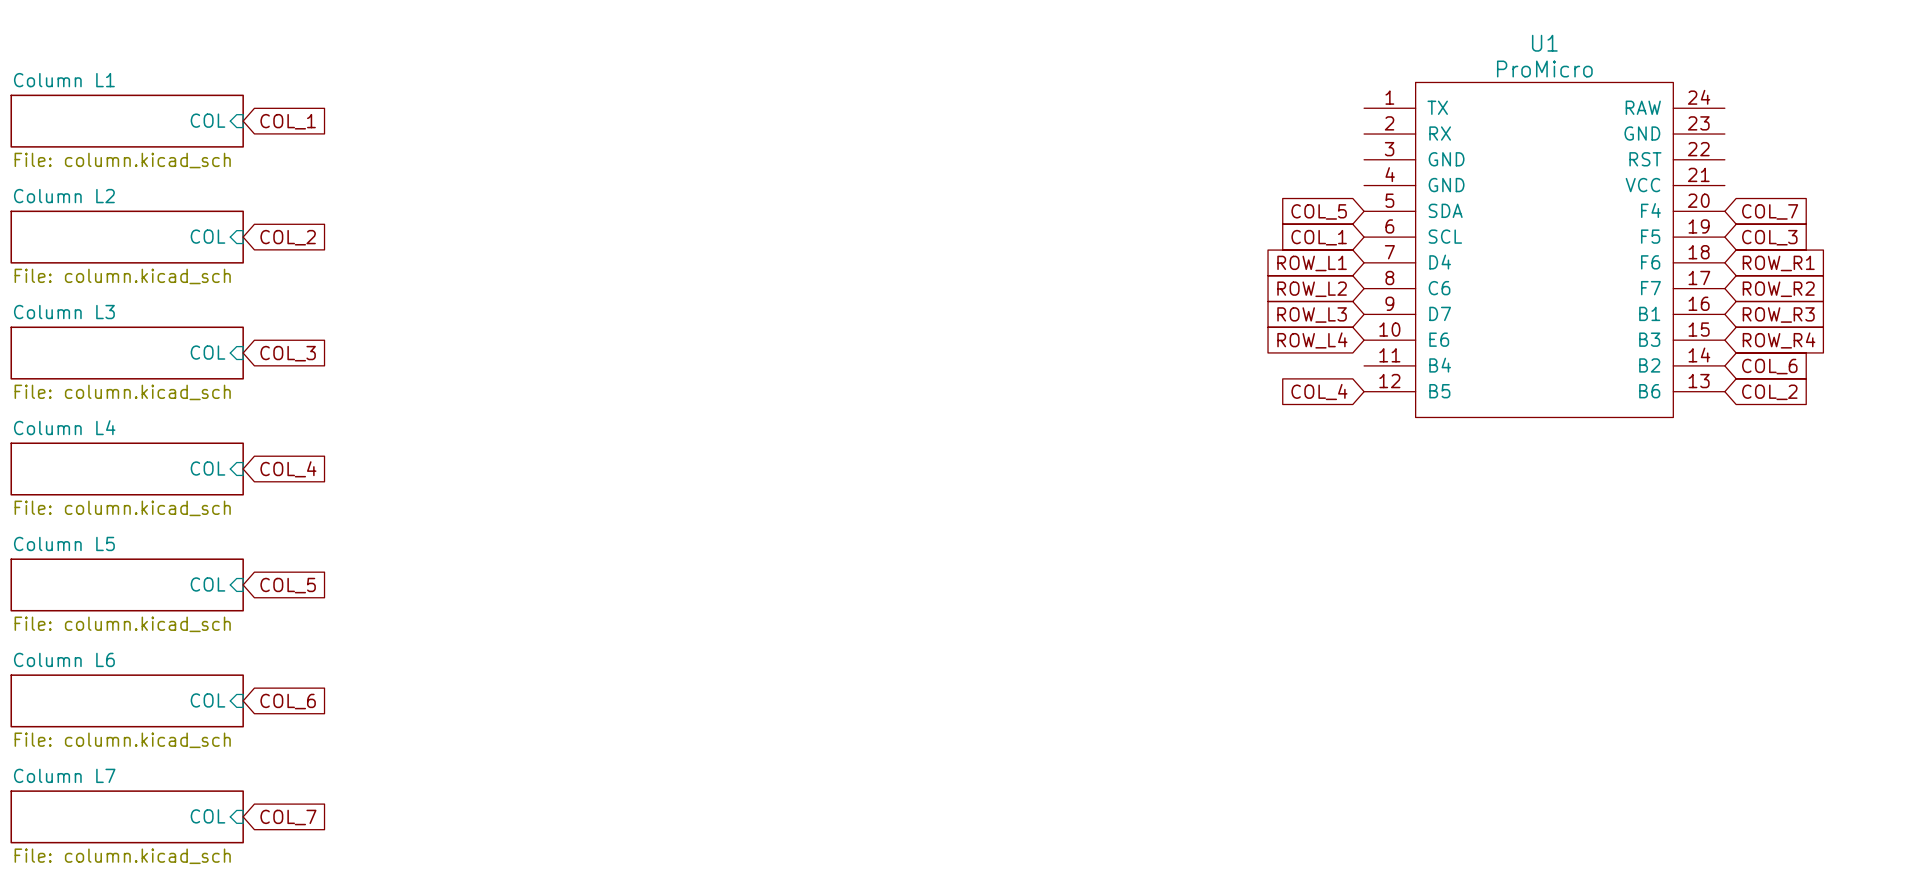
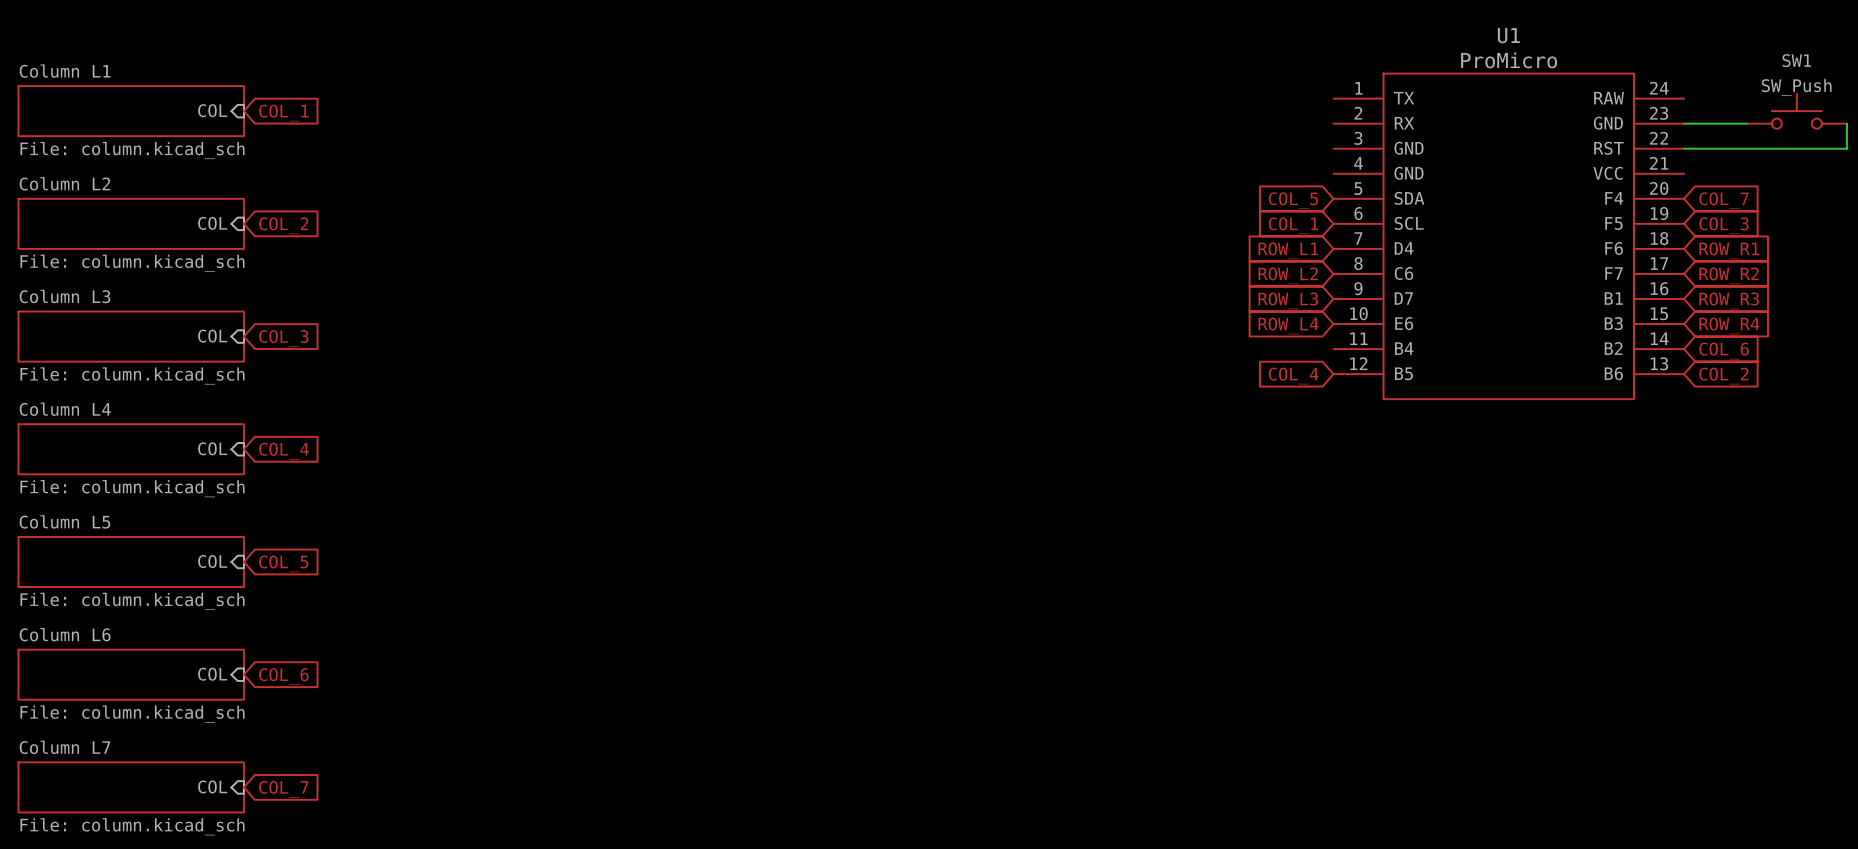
SW1: none -> SW_Push (1796, 111)
wire: none -> (1684, 123) (1746, 123)
wire: none -> (1846, 123) (1846, 148) (1684, 148)

